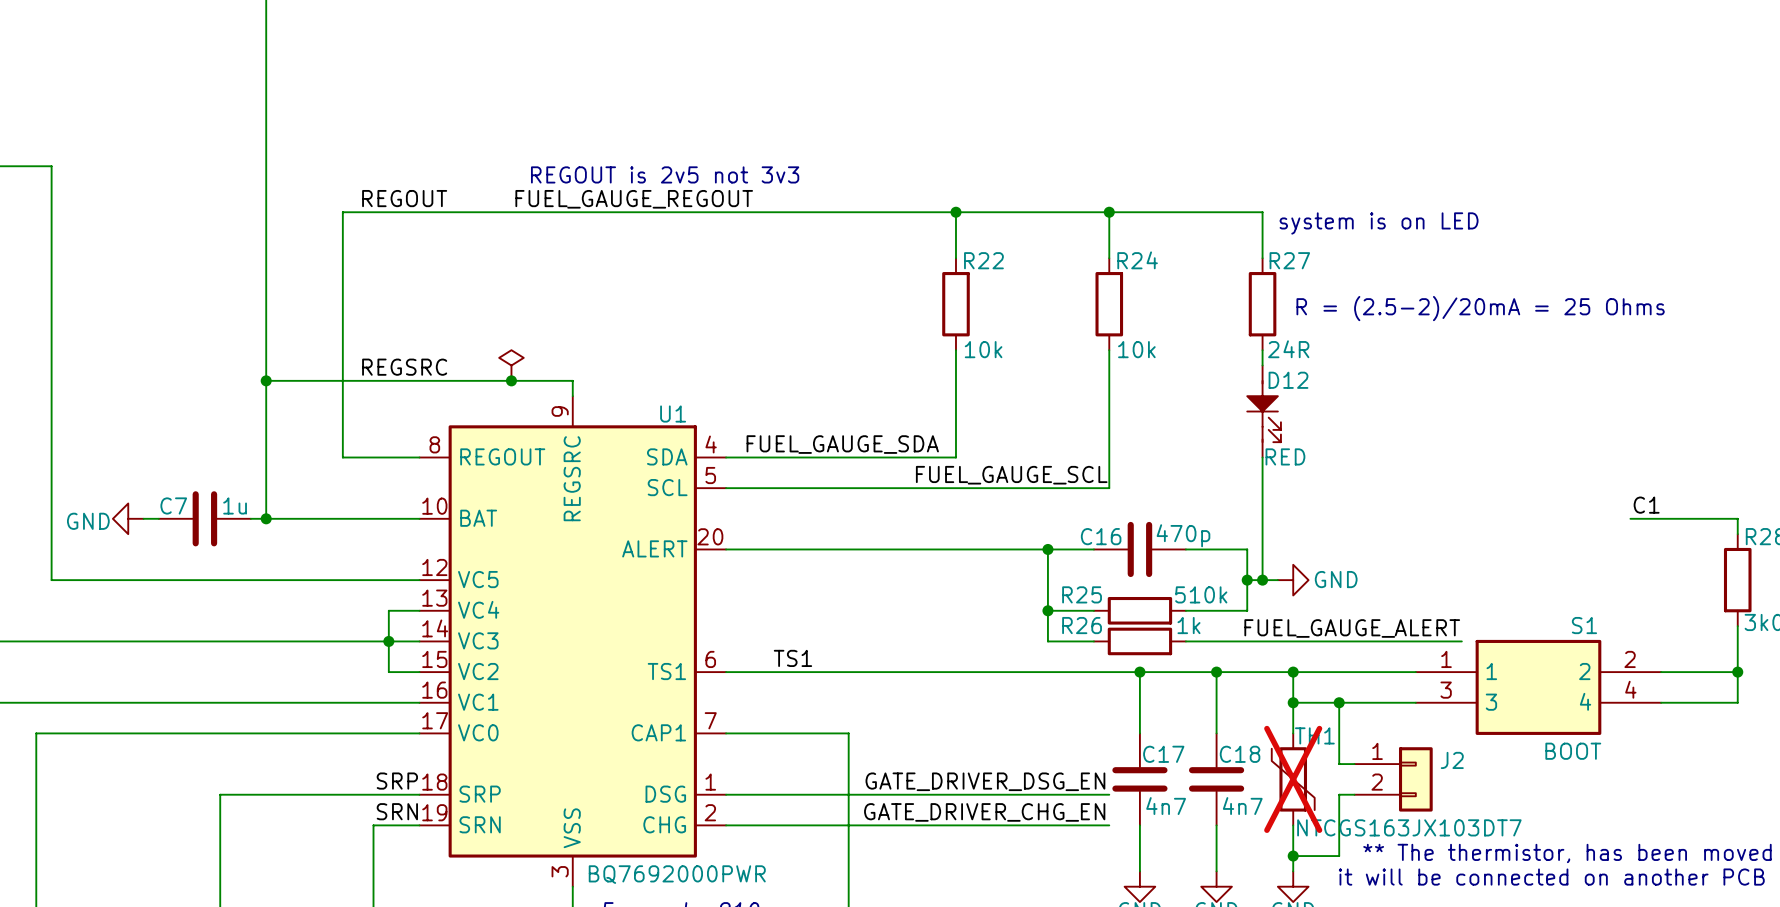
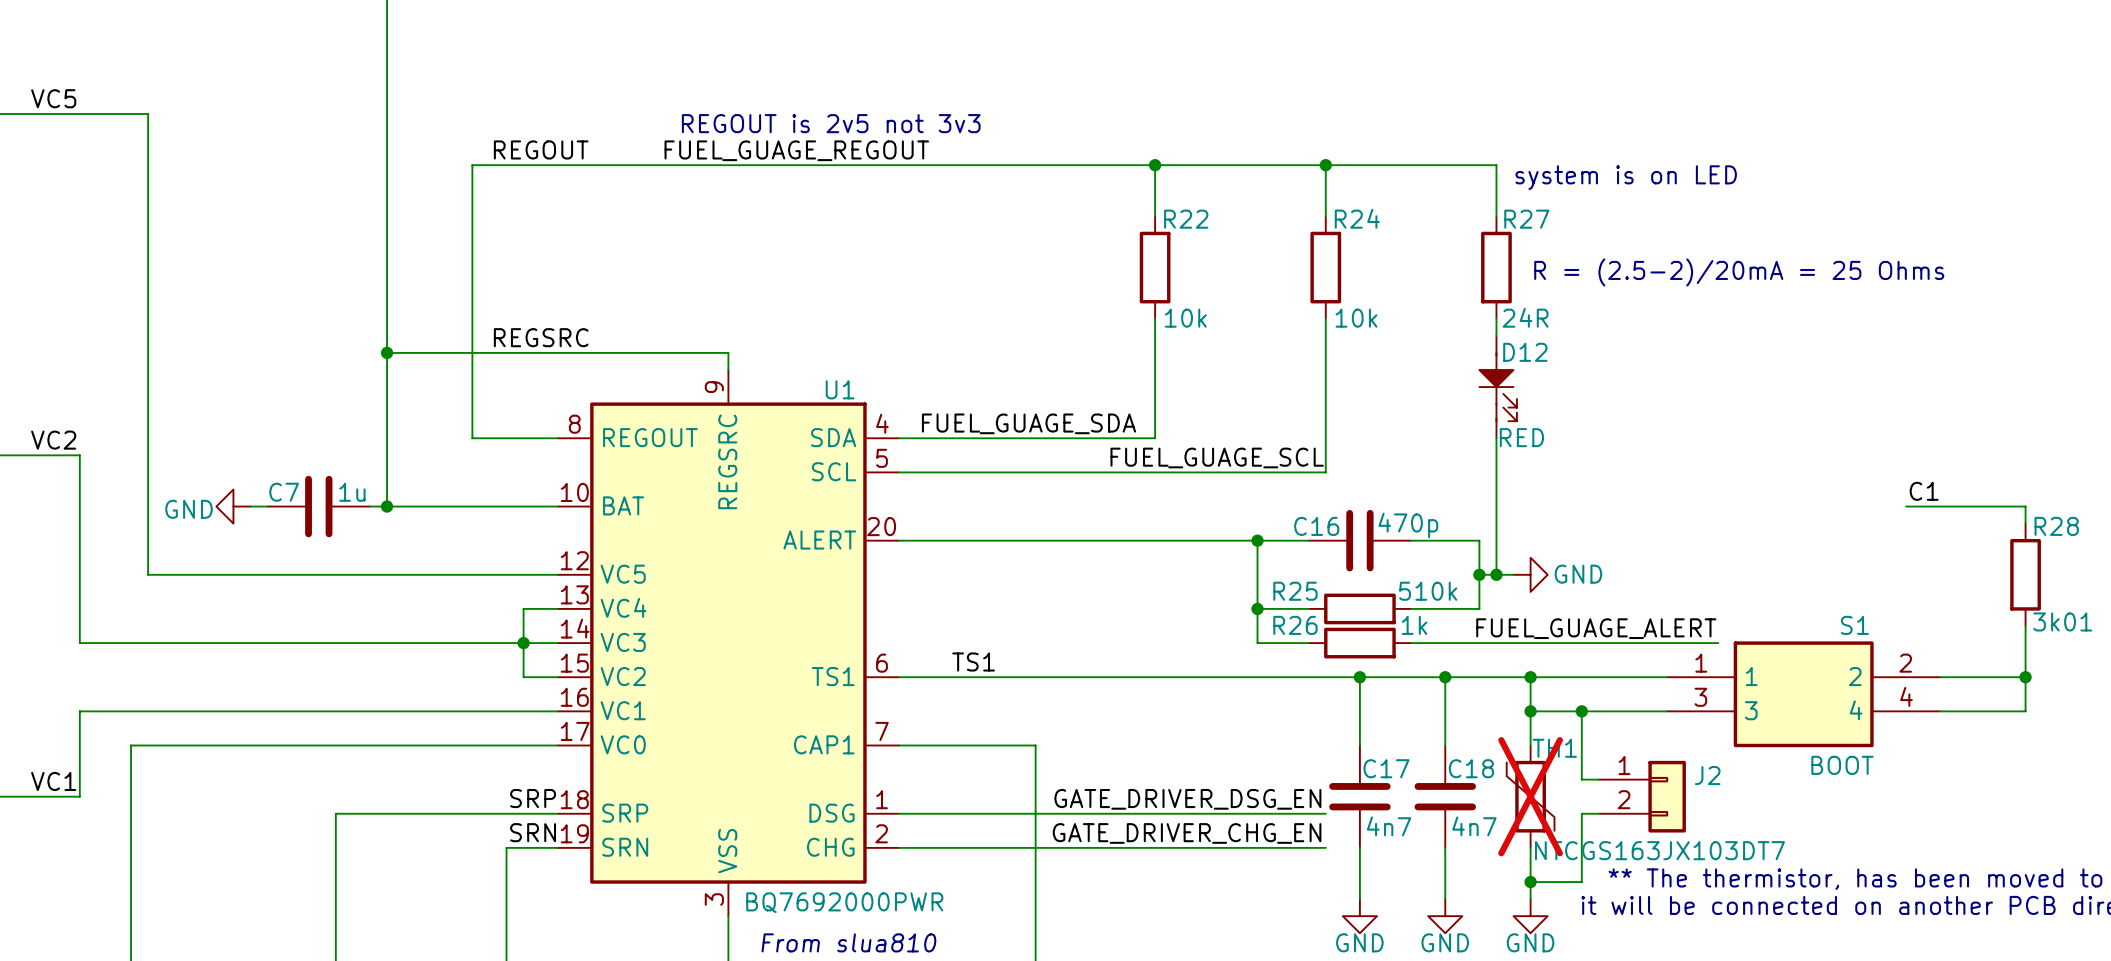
label: FUEL_GAUGE_REGOUT (634, 199) -> FUEL_GUAGE_REGOUT (796, 150)
power symbol: (511, 365) -> none
junction: (511, 380) -> none
label: FUEL_GAUGE_SDA (842, 444) -> FUEL_GUAGE_SDA (1029, 423)
label: FUEL_GAUGE_SCL (1011, 475) -> FUEL_GUAGE_SCL (1217, 457)
label: FUEL_GAUGE_ALERT (1352, 628) -> FUEL_GUAGE_ALERT (1596, 628)

